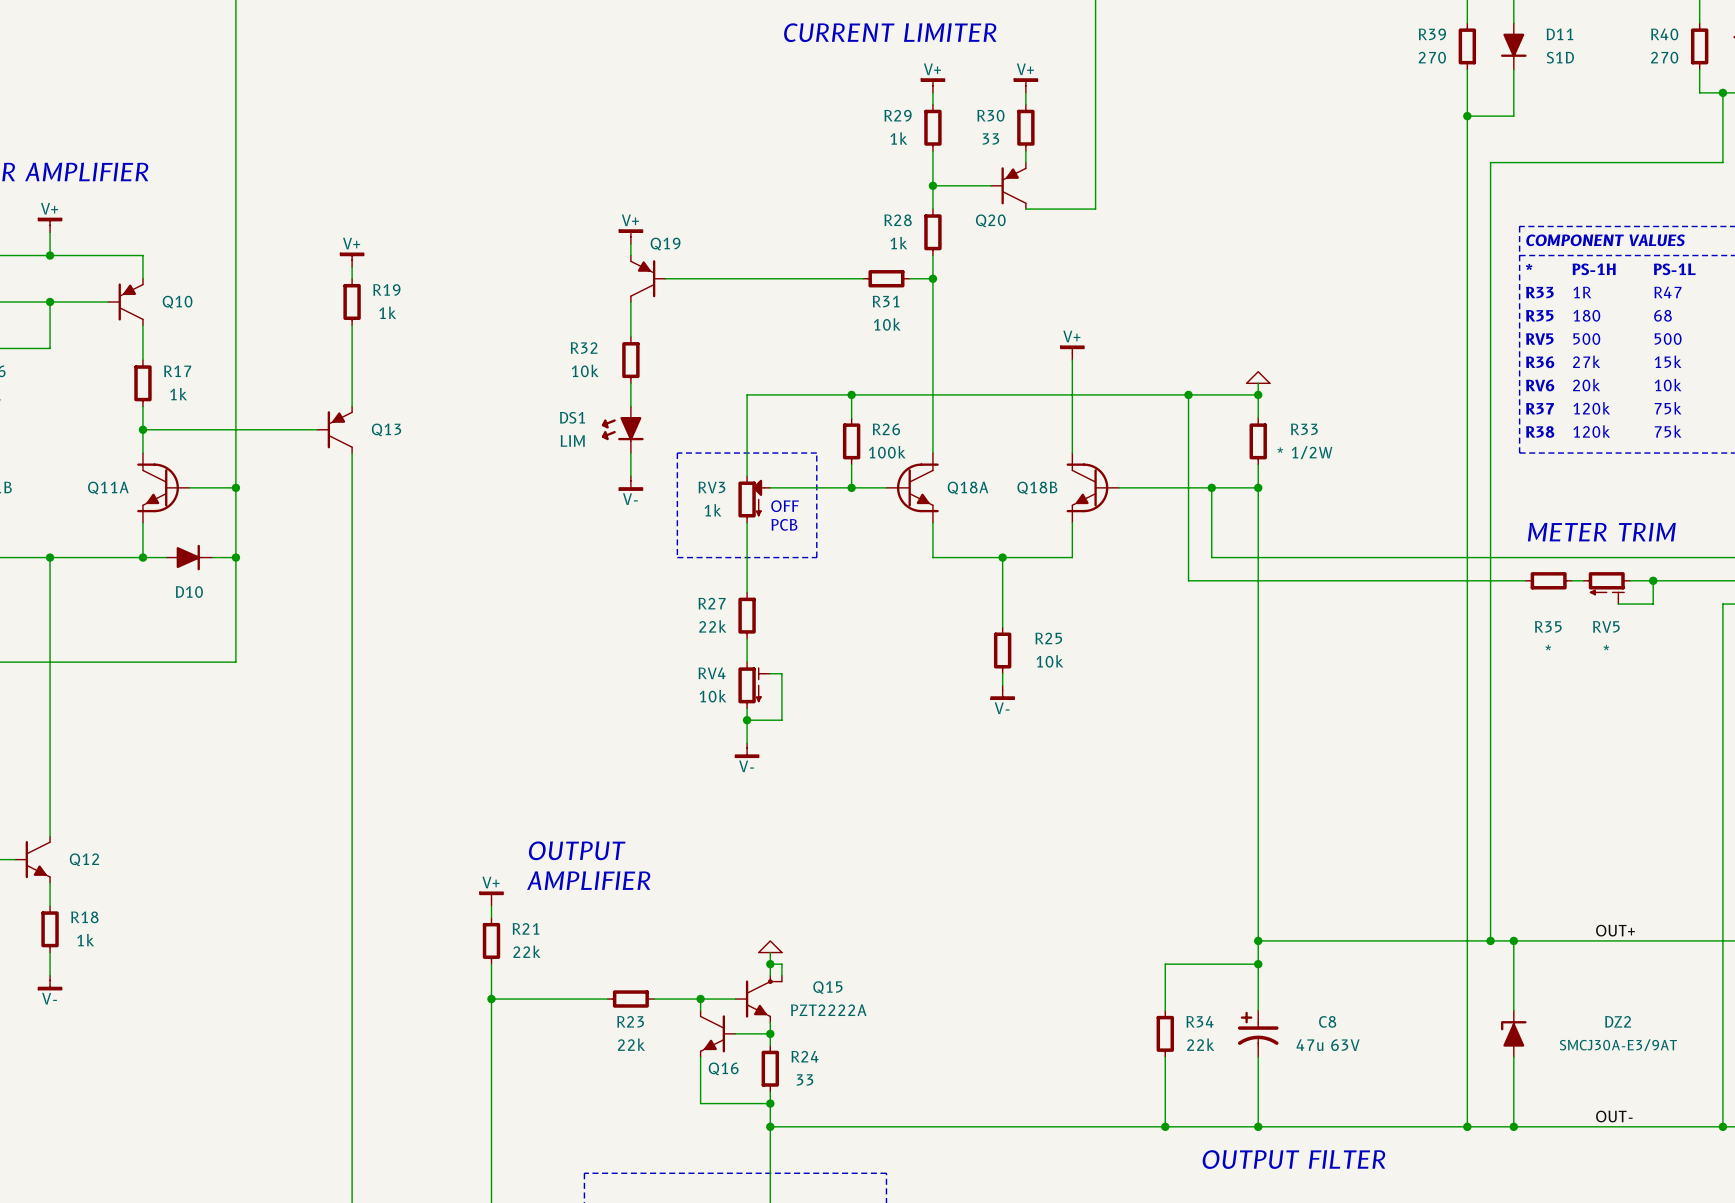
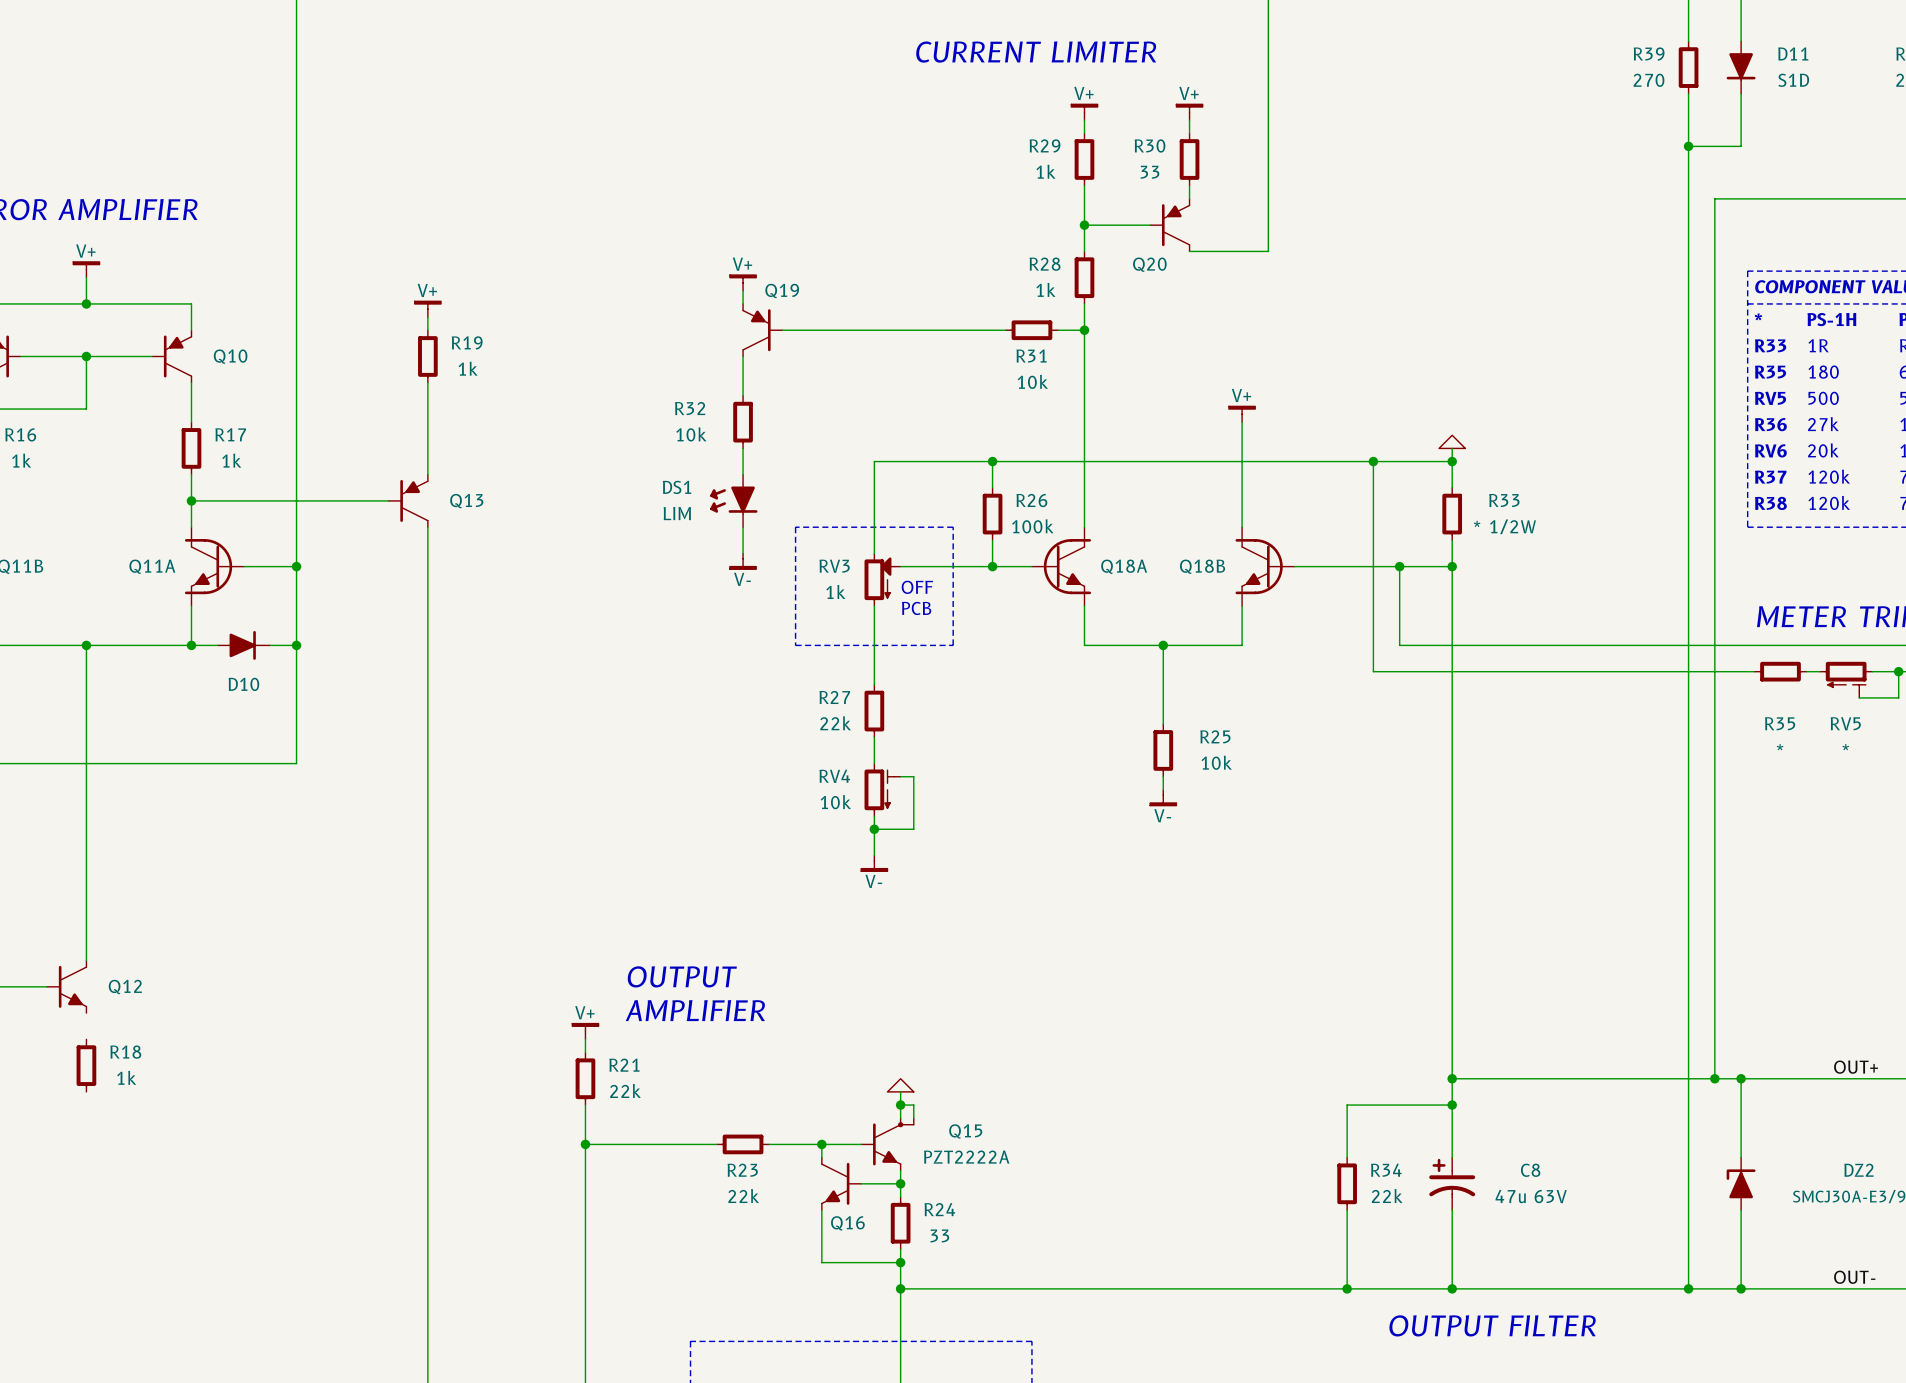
wire: (50, 882) (50, 906) -> none
wire: (50, 952) (50, 975) -> none
power symbol: V- (50, 982) -> none

